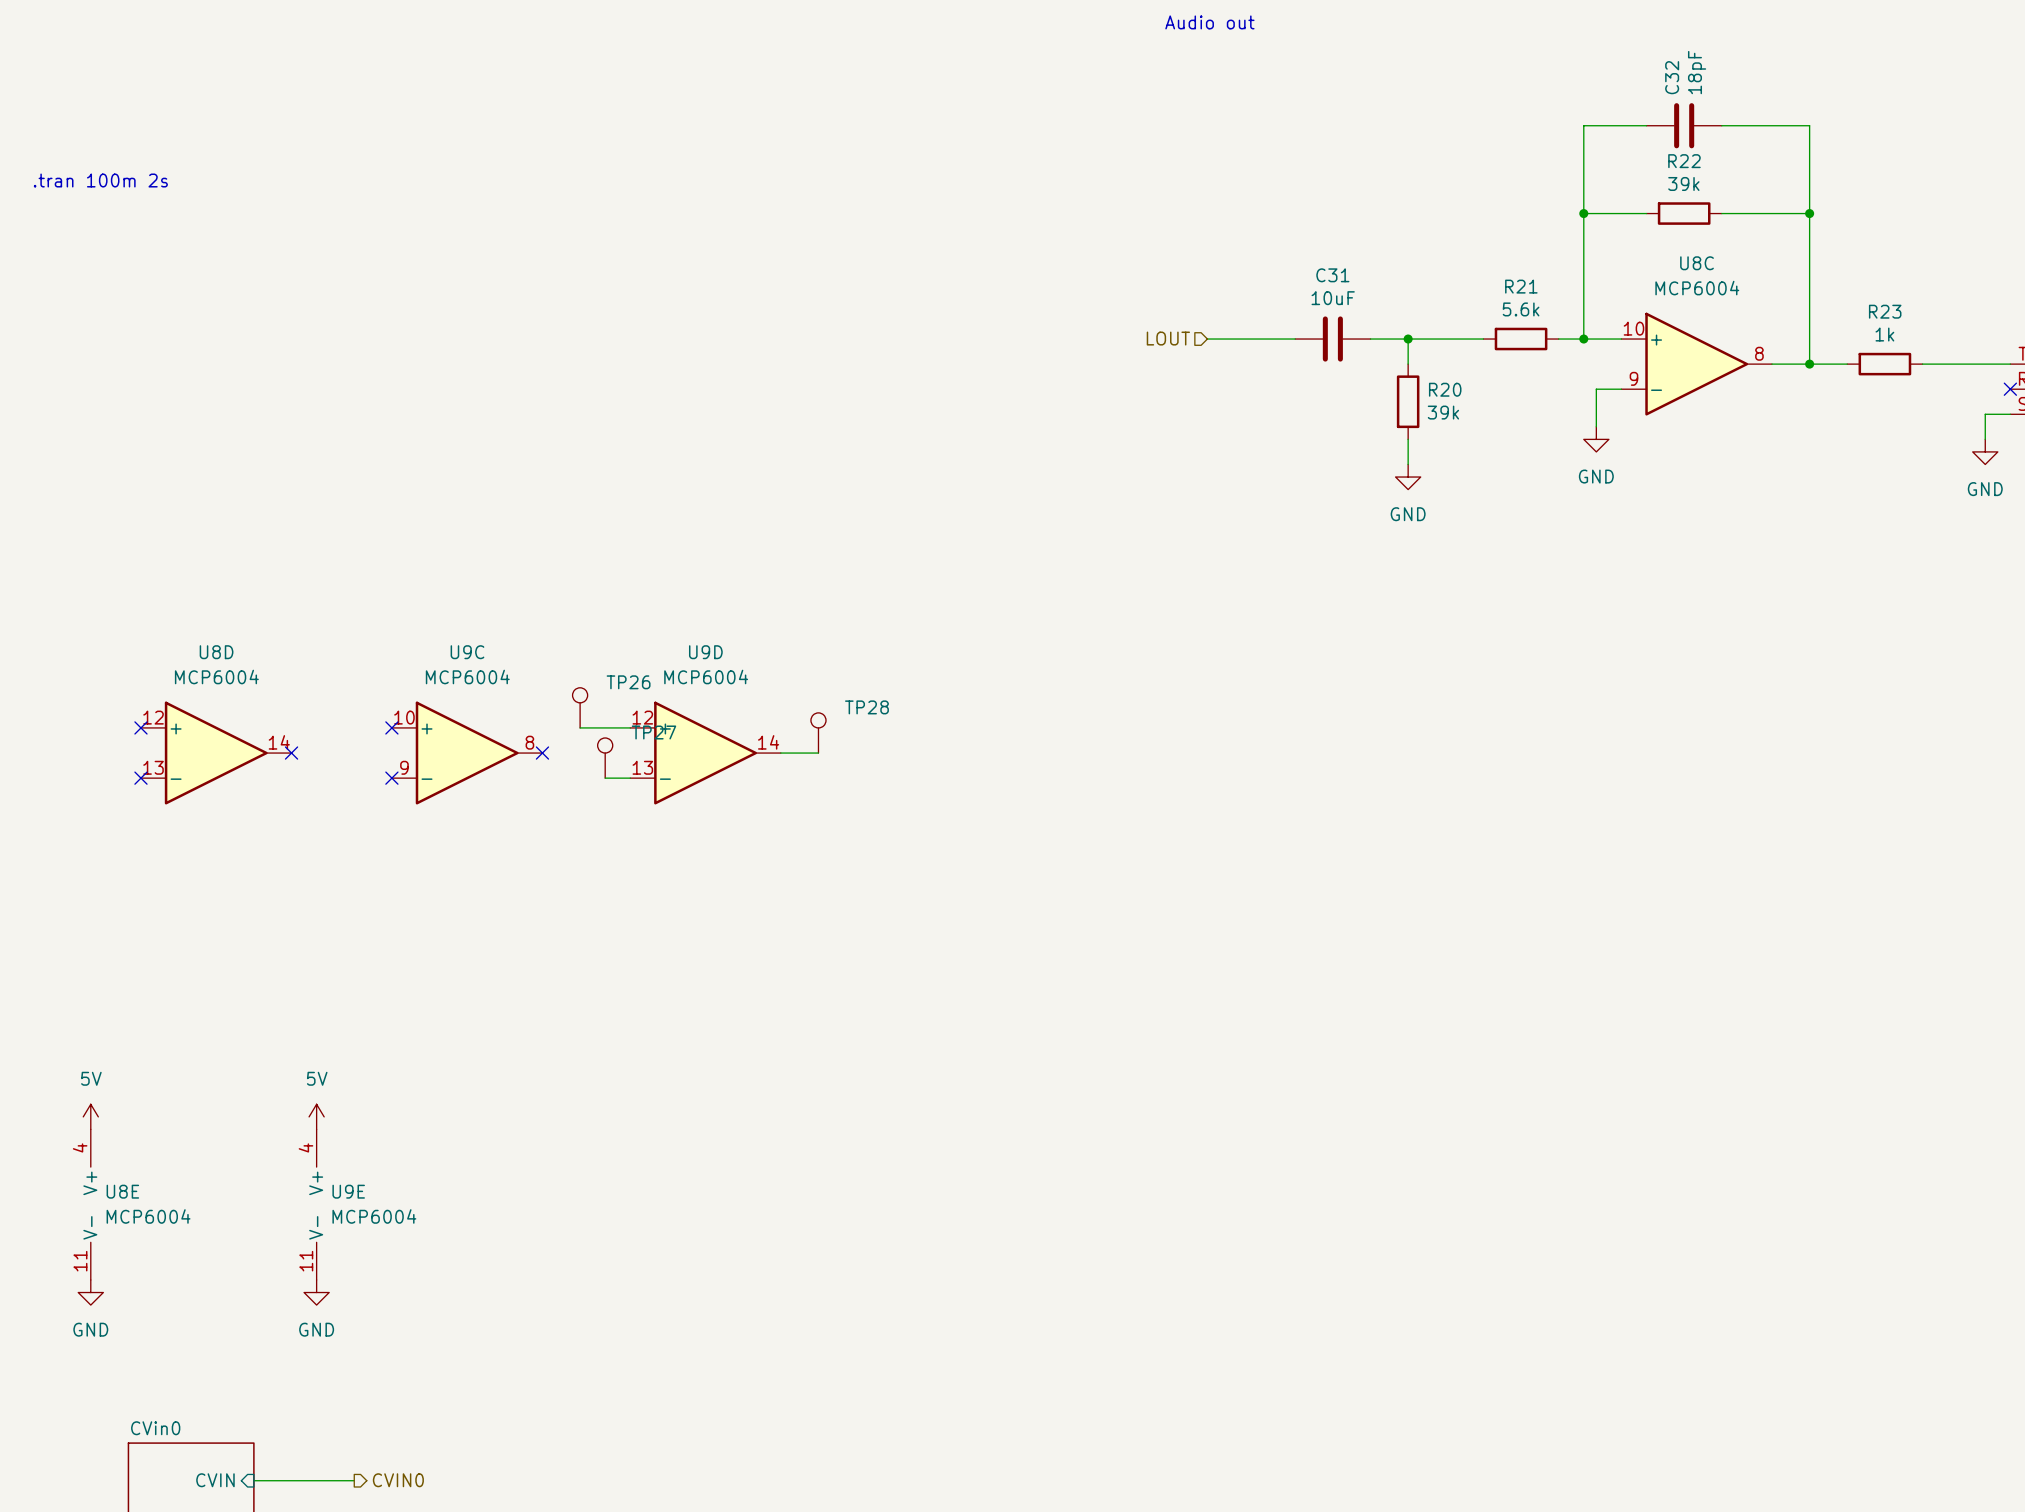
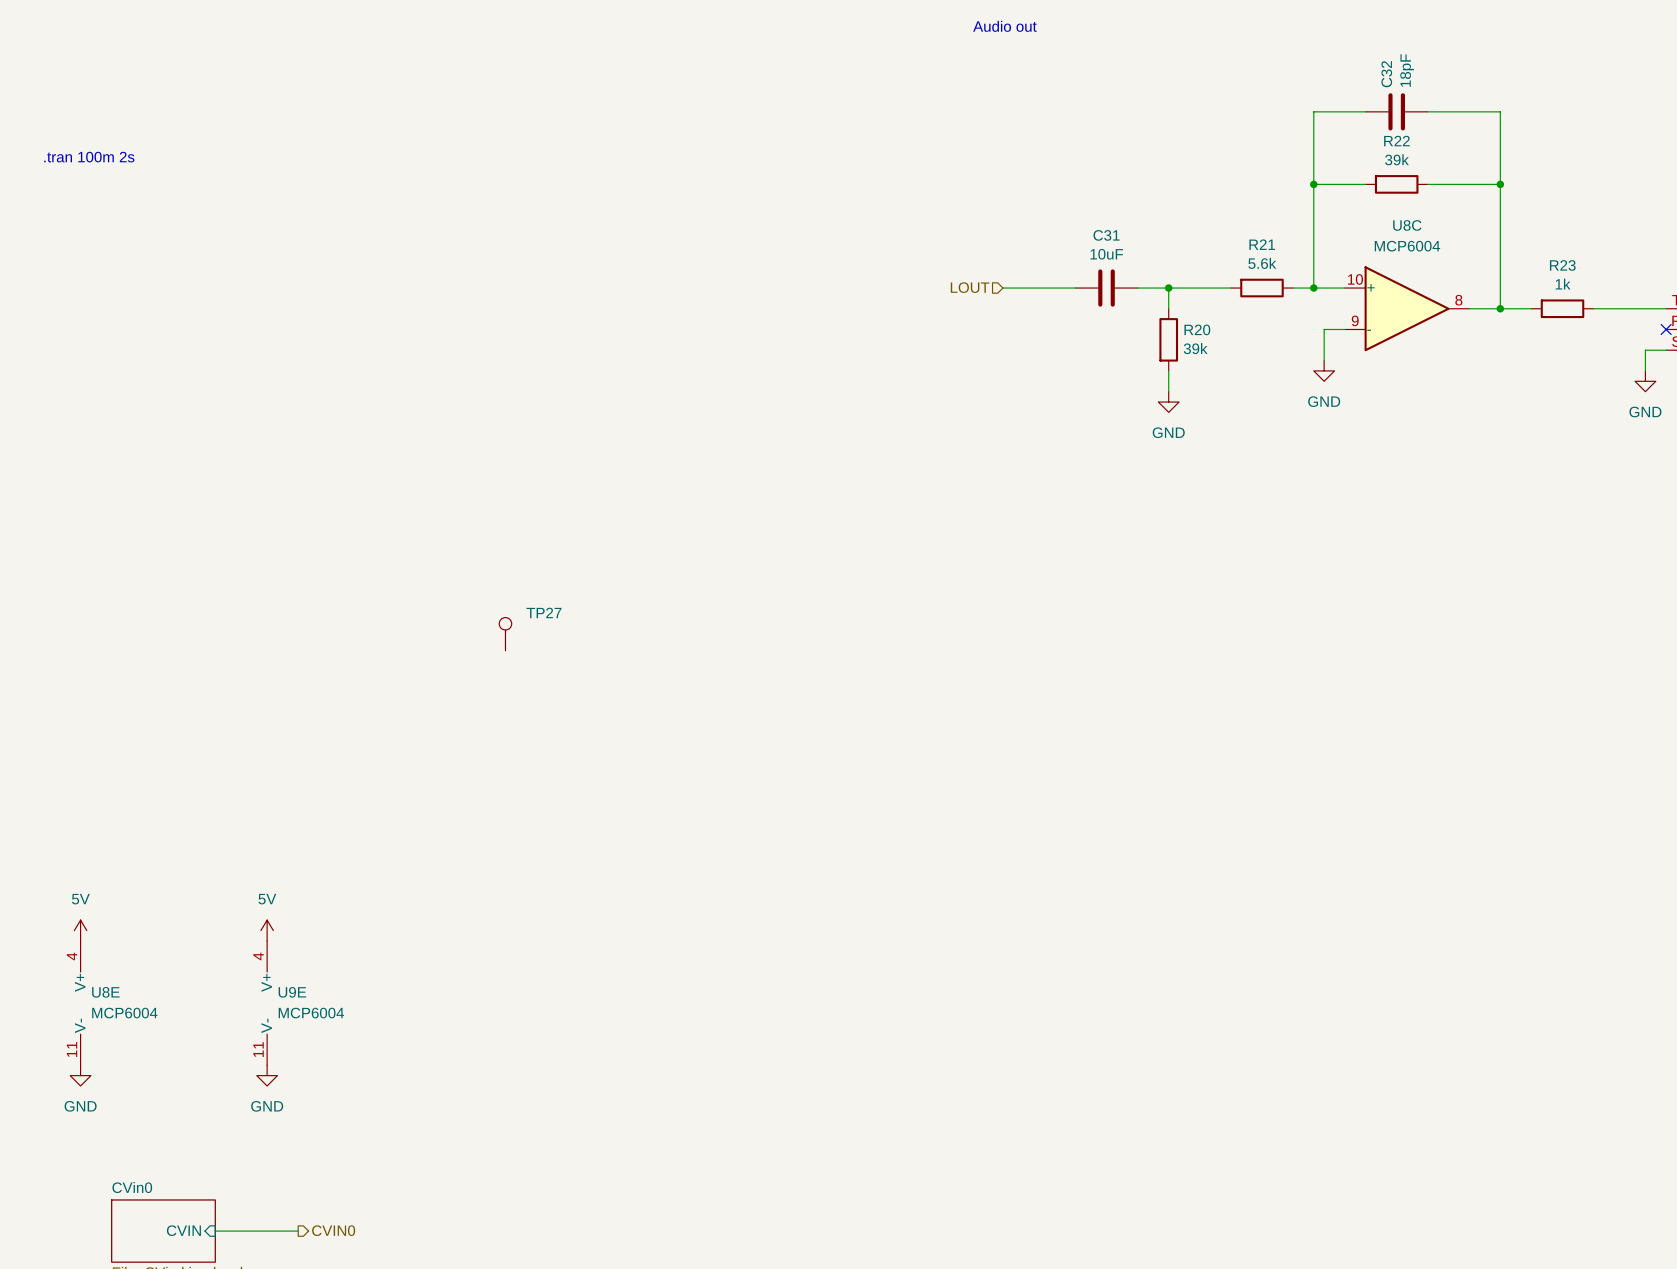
TP26: (580, 707) -> none
no-connect mark: (140, 727) -> none
no-connect mark: (391, 727) -> none
wire: (580, 727) (630, 727) -> none
TP28: (818, 732) -> none
U8D: MCP6004 (216, 753) -> none
no-connect mark: (291, 753) -> none
U9C: MCP6004 (467, 753) -> none
no-connect mark: (542, 753) -> none
U9D: MCP6004 (705, 753) -> none
wire: (780, 753) (818, 753) -> none
no-connect mark: (140, 778) -> none
no-connect mark: (391, 778) -> none
wire: (605, 778) (630, 778) -> none

